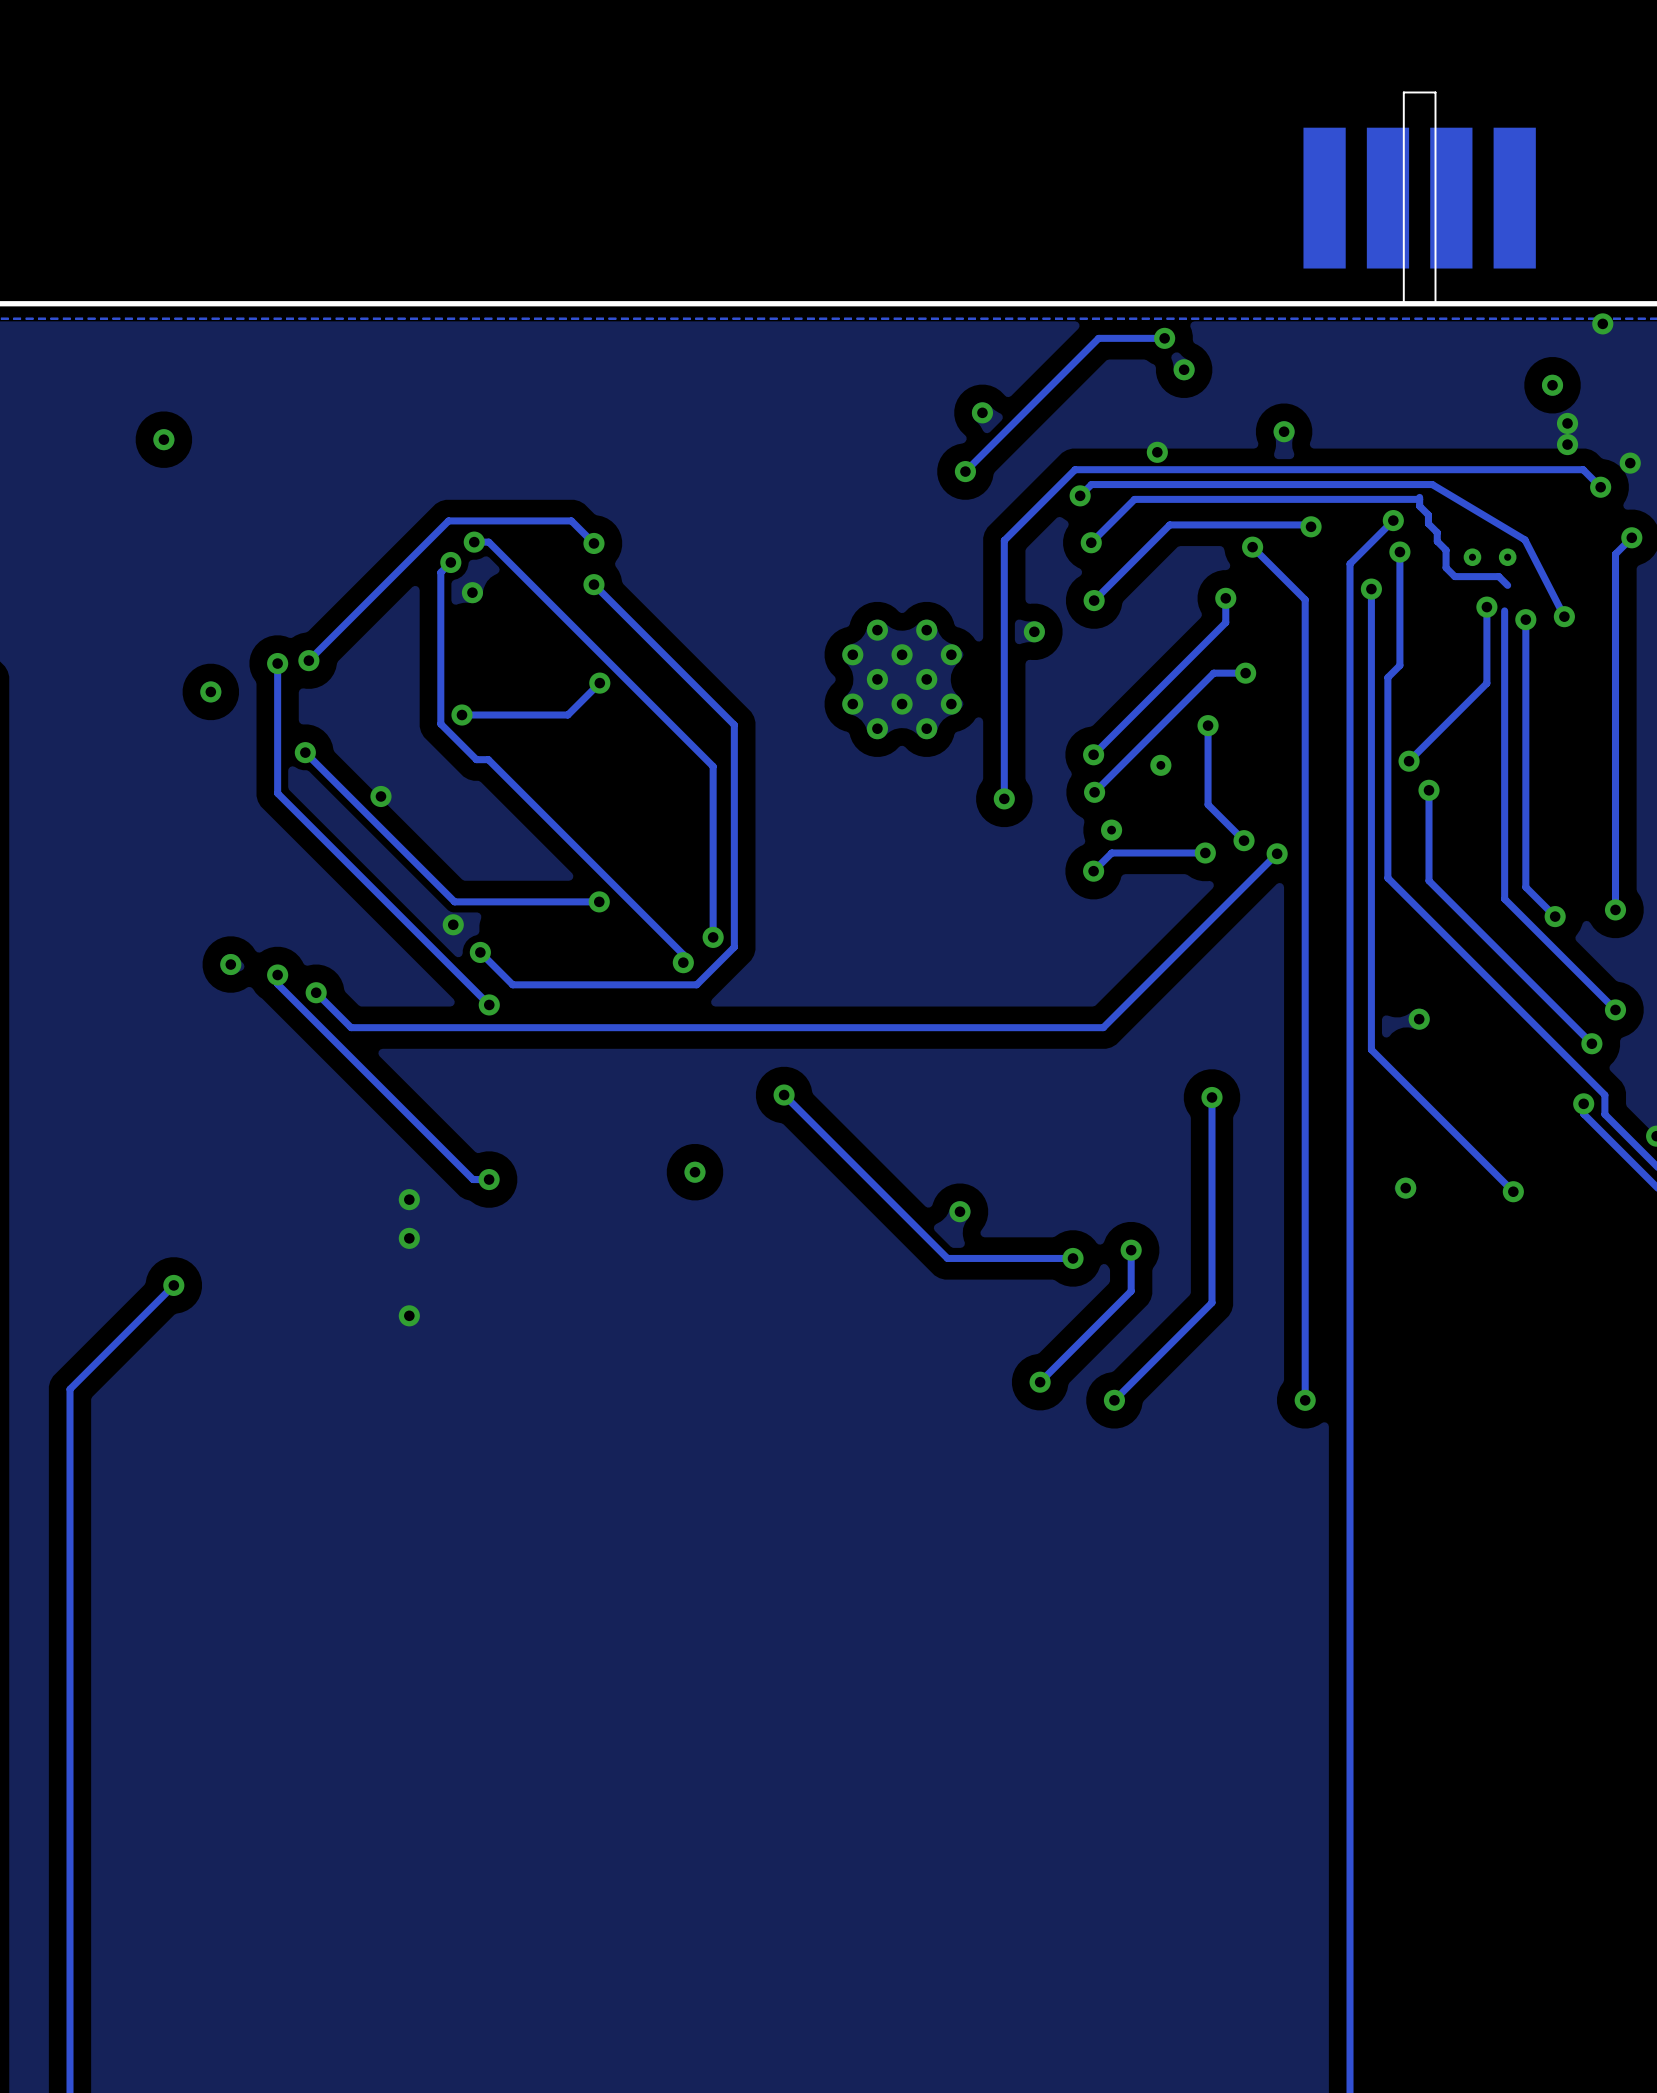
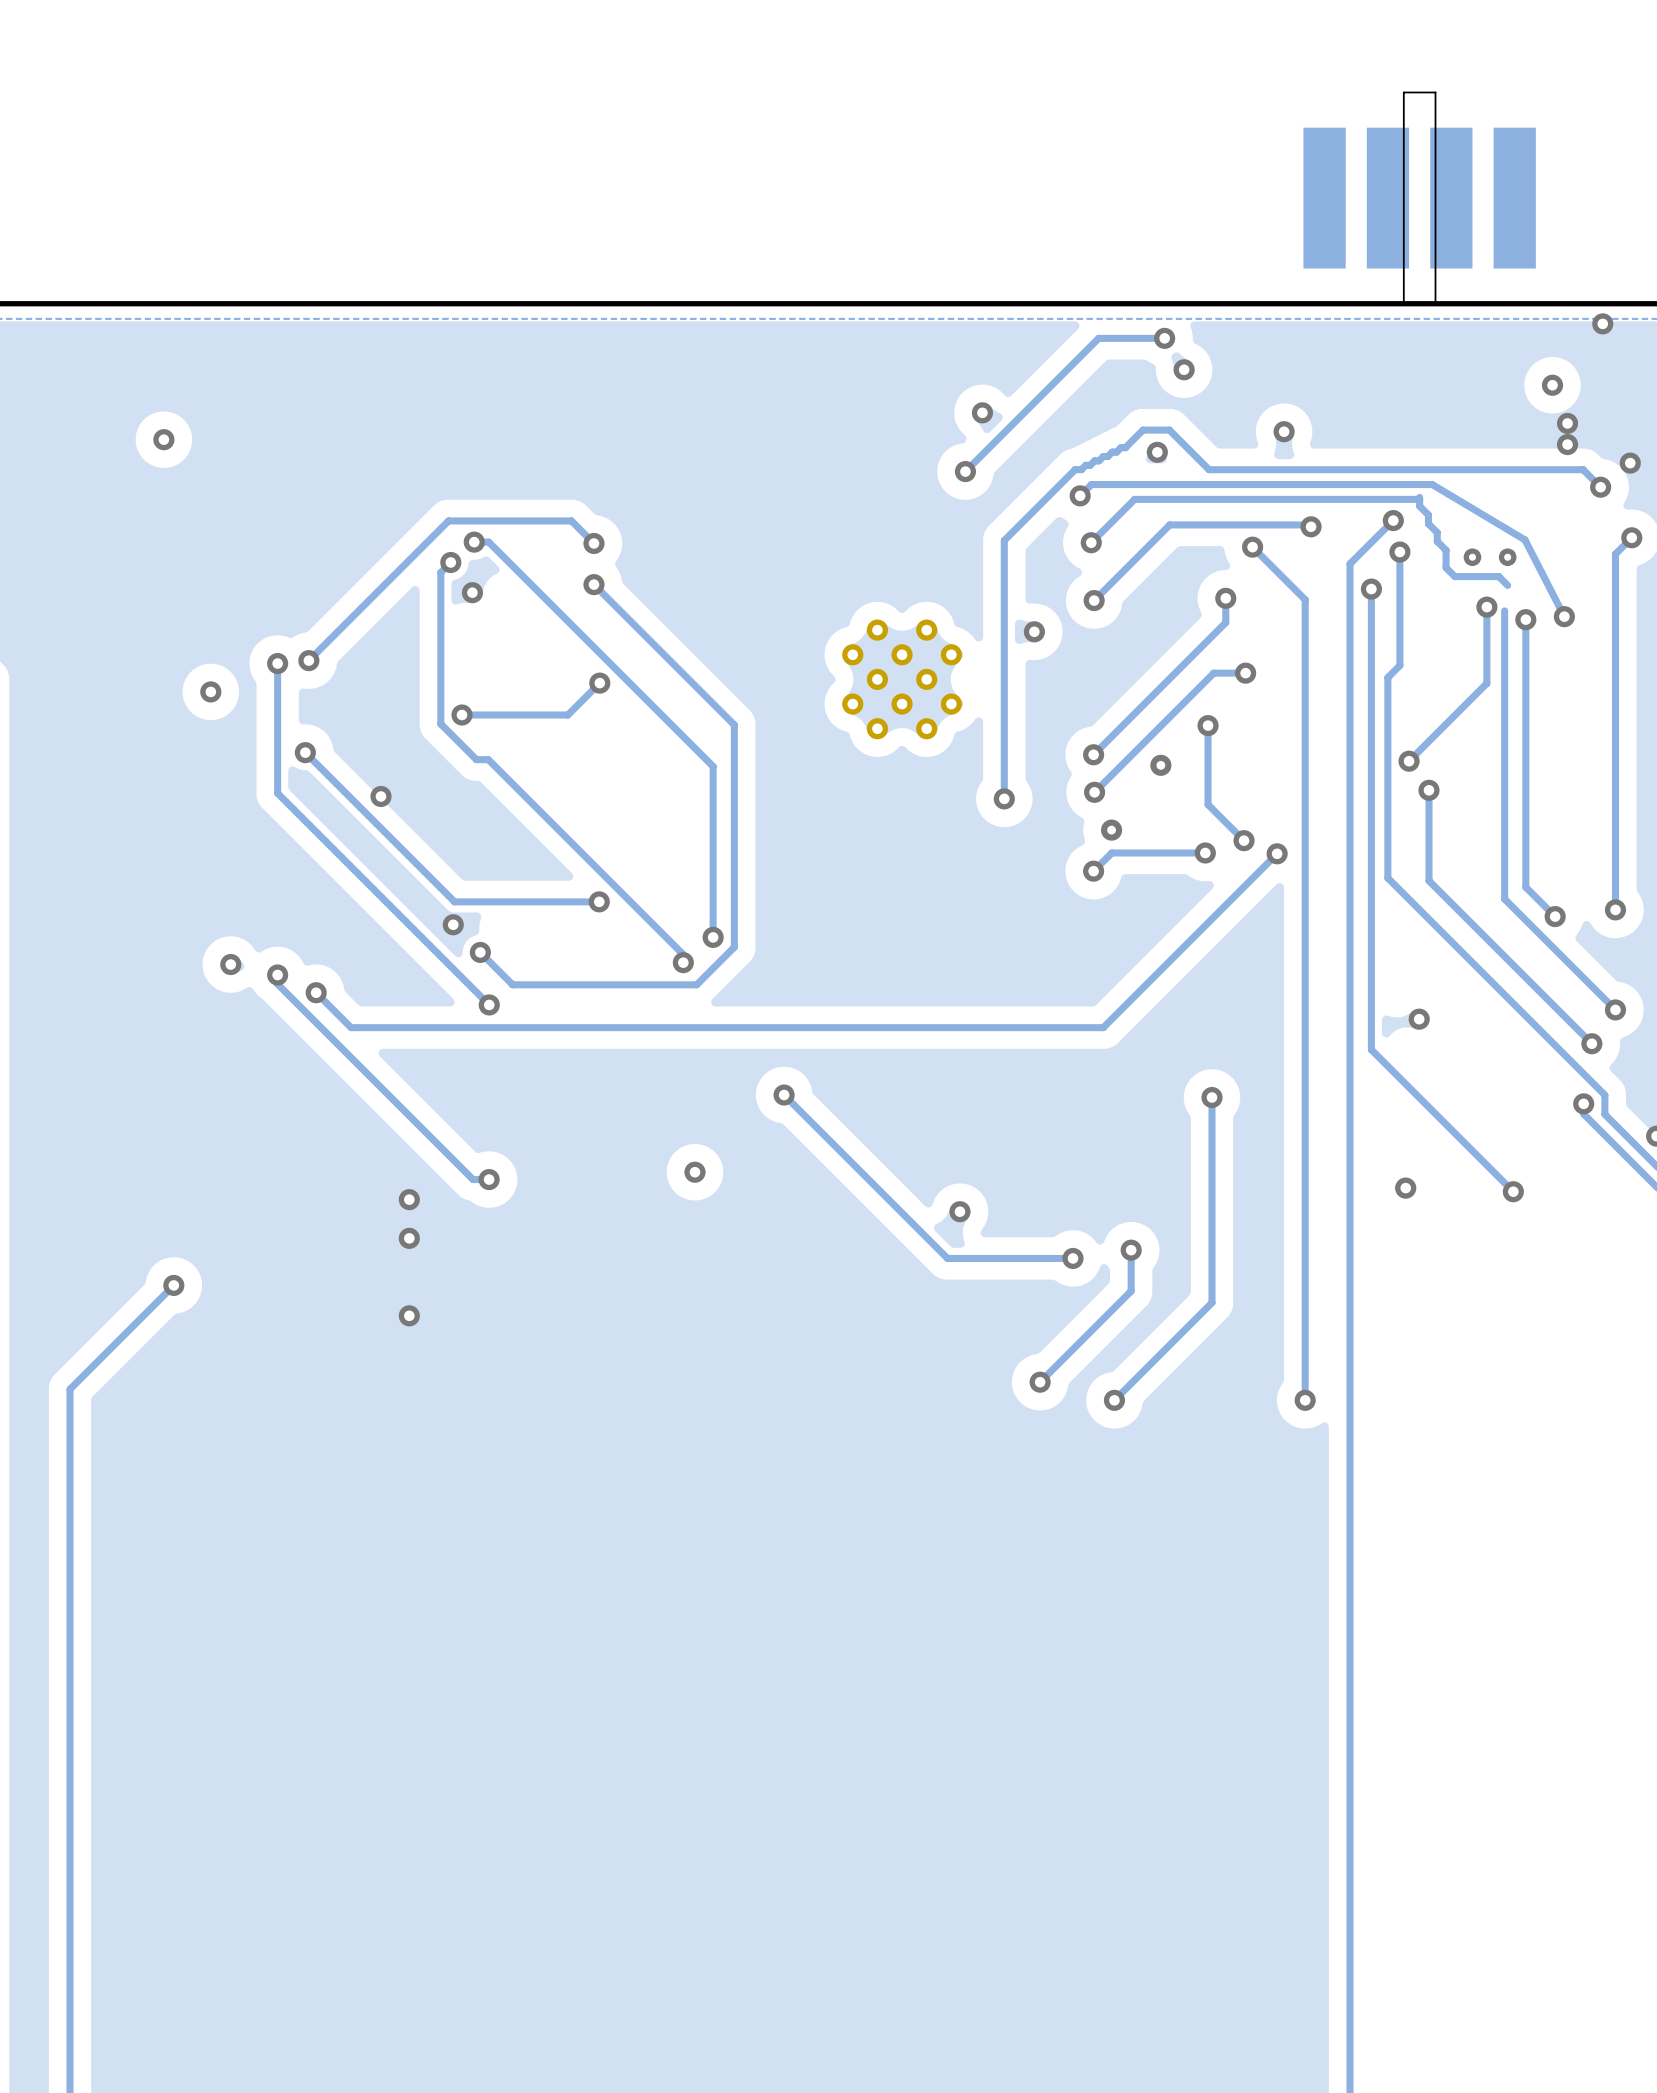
track: (1209, 469) (1081, 469) -> (1209, 469) (1169, 430) (1143, 430) (1125, 447) (1121, 447) (1116, 452) (1112, 452) (1107, 456) (1103, 456) (1099, 460) (1094, 460) (1081, 469)

